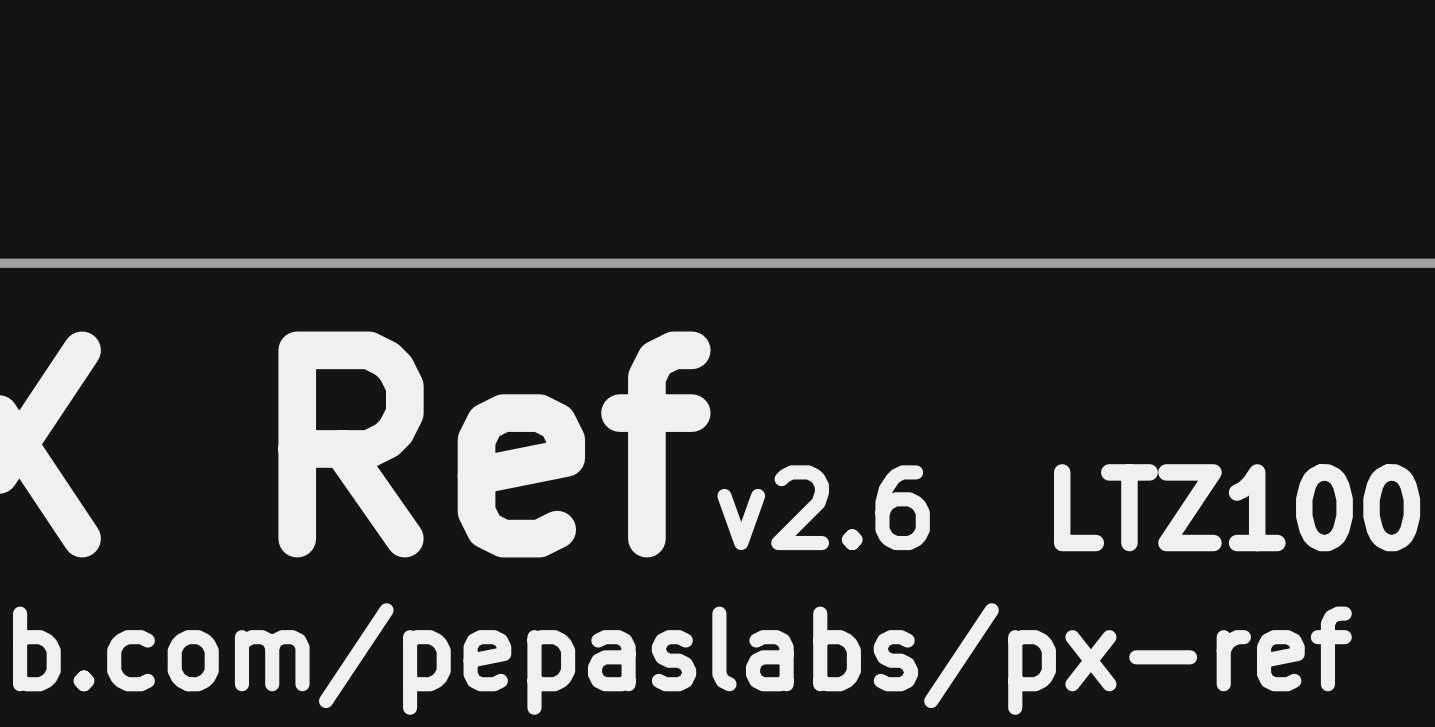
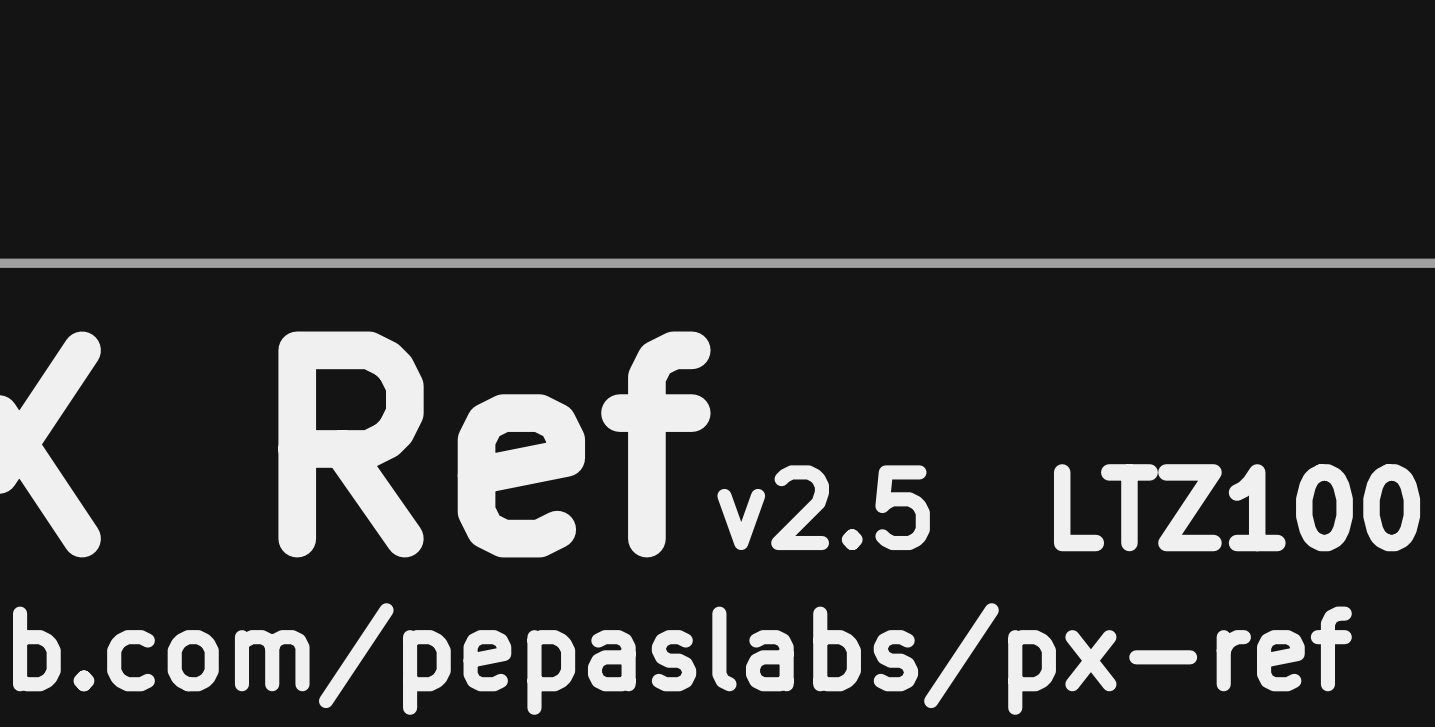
text: v2.6 (823, 507) -> v2.5 (823, 507)

